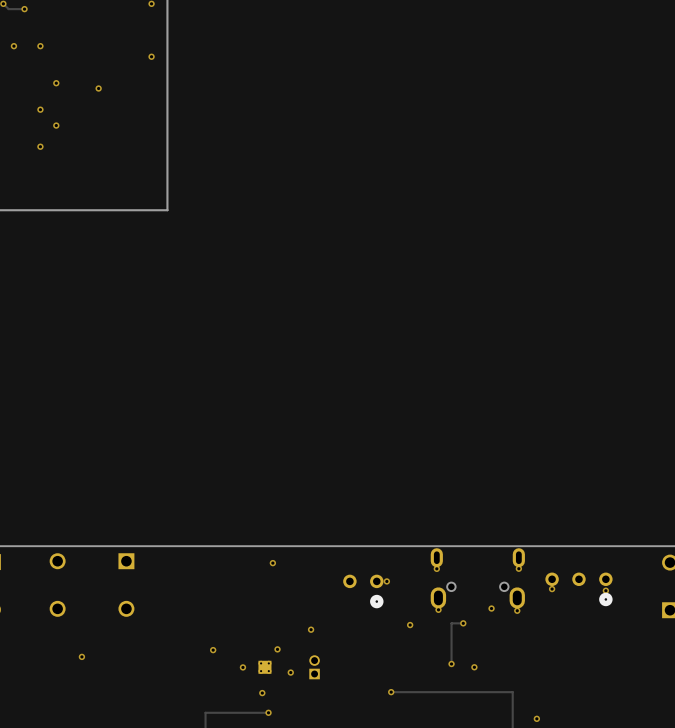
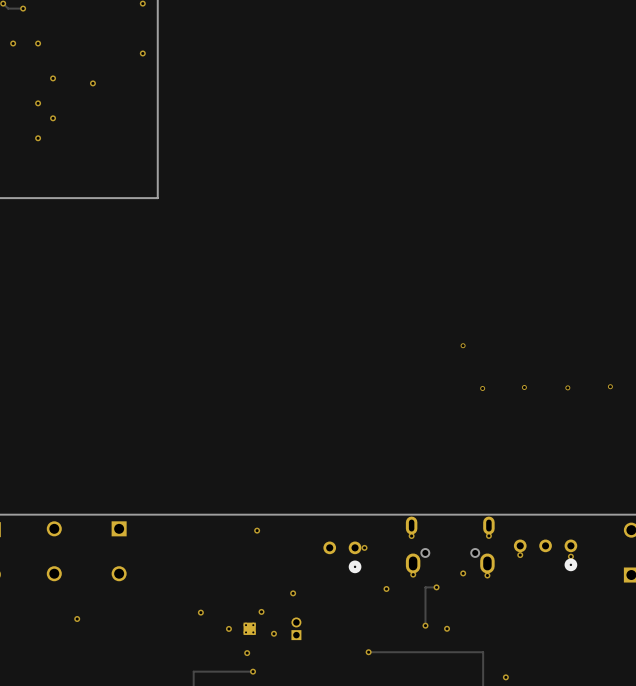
via: none -> (463, 345)
via: none -> (610, 386)
via: none -> (524, 387)
via: none -> (567, 387)
via: none -> (482, 388)

